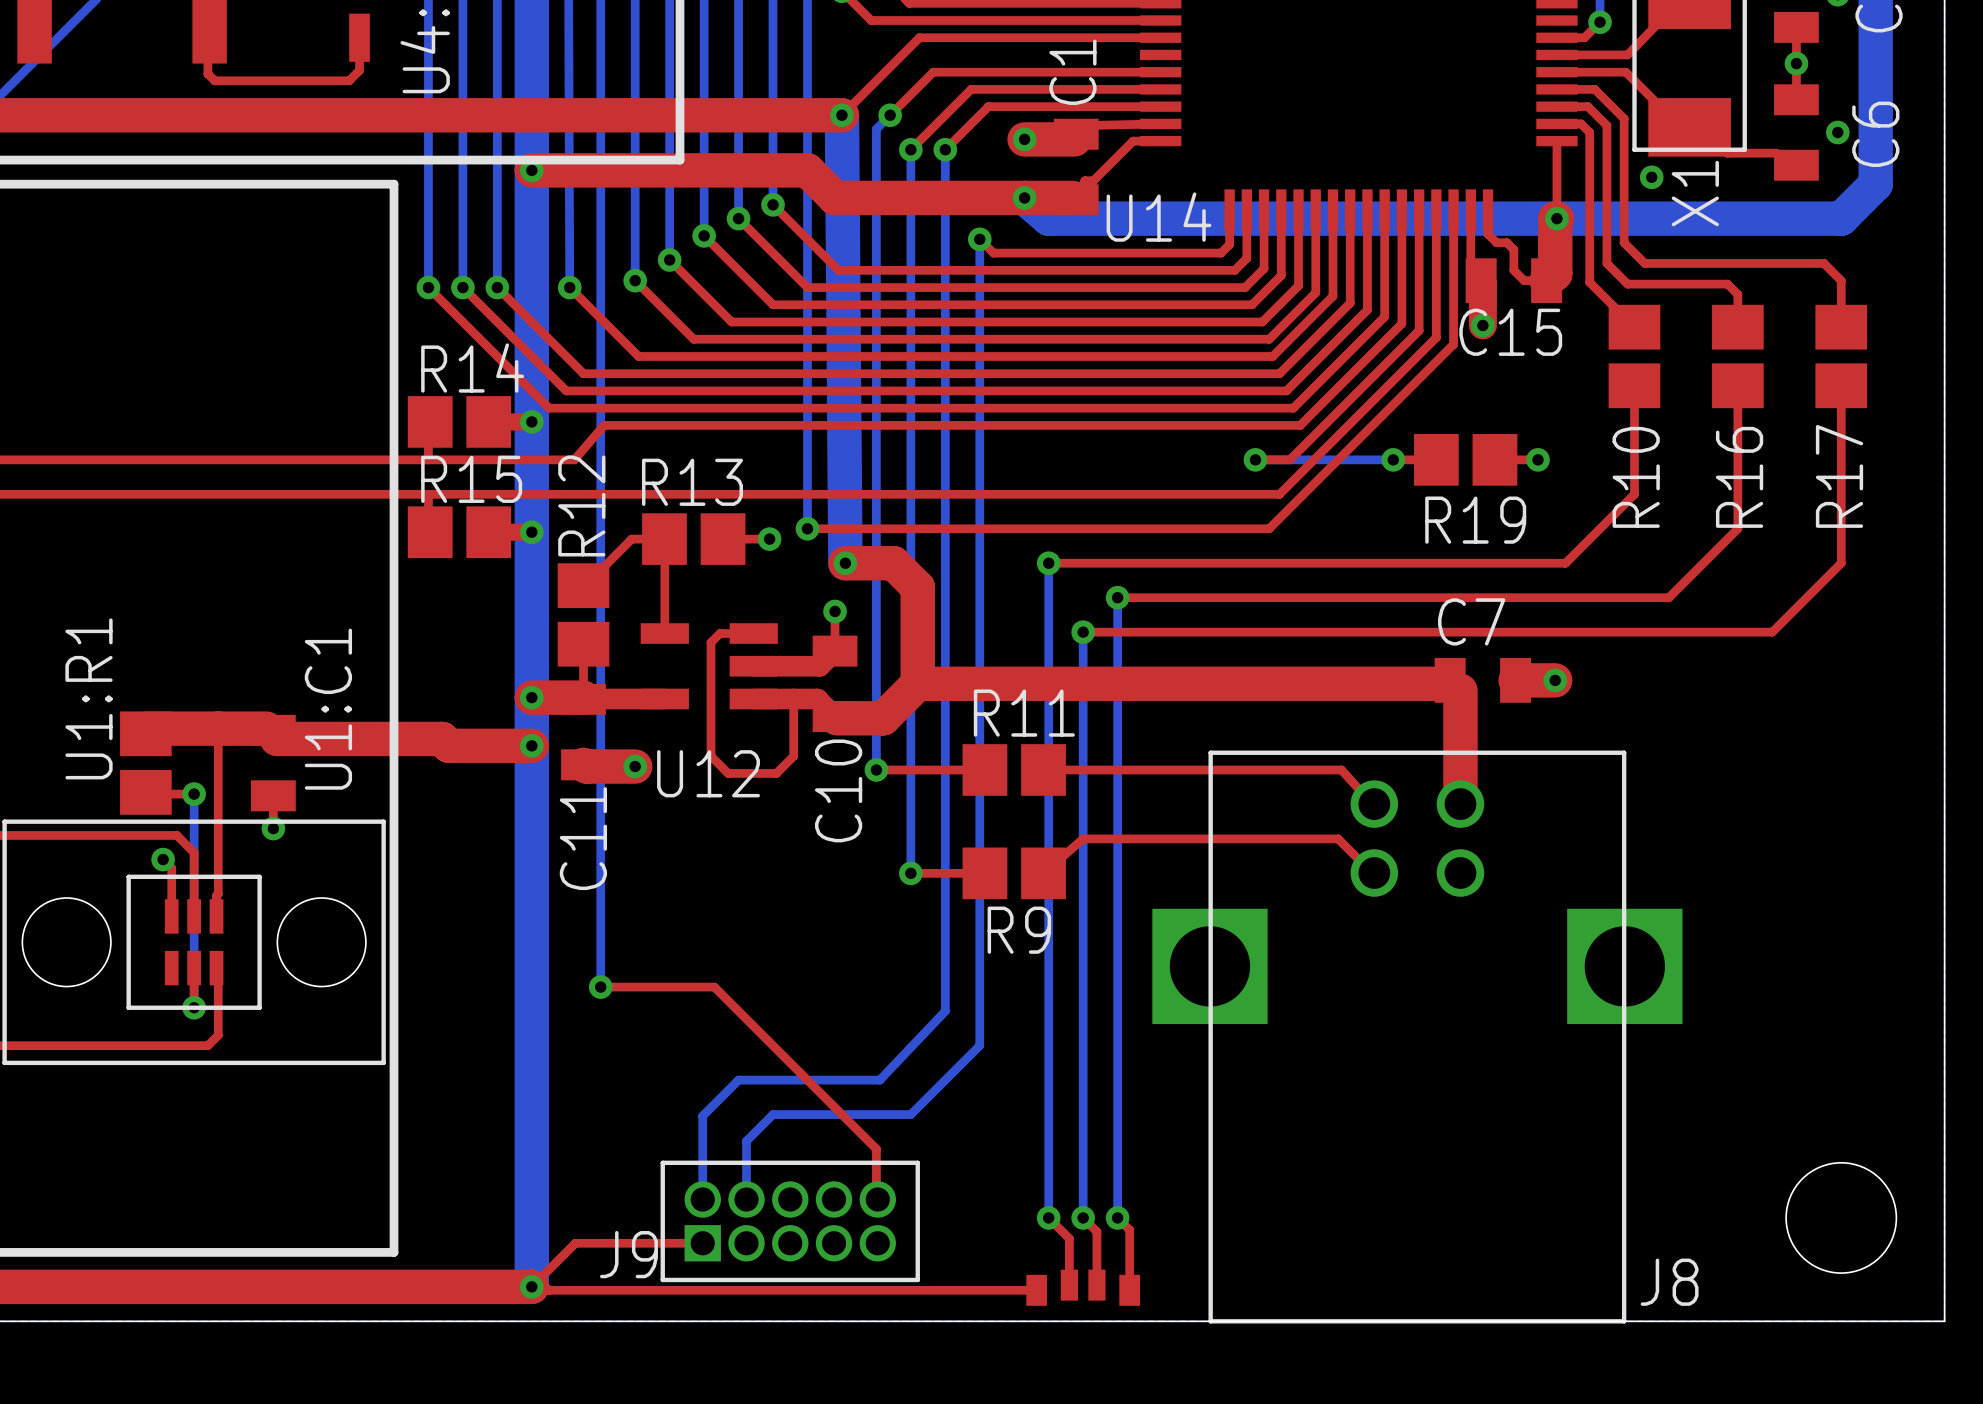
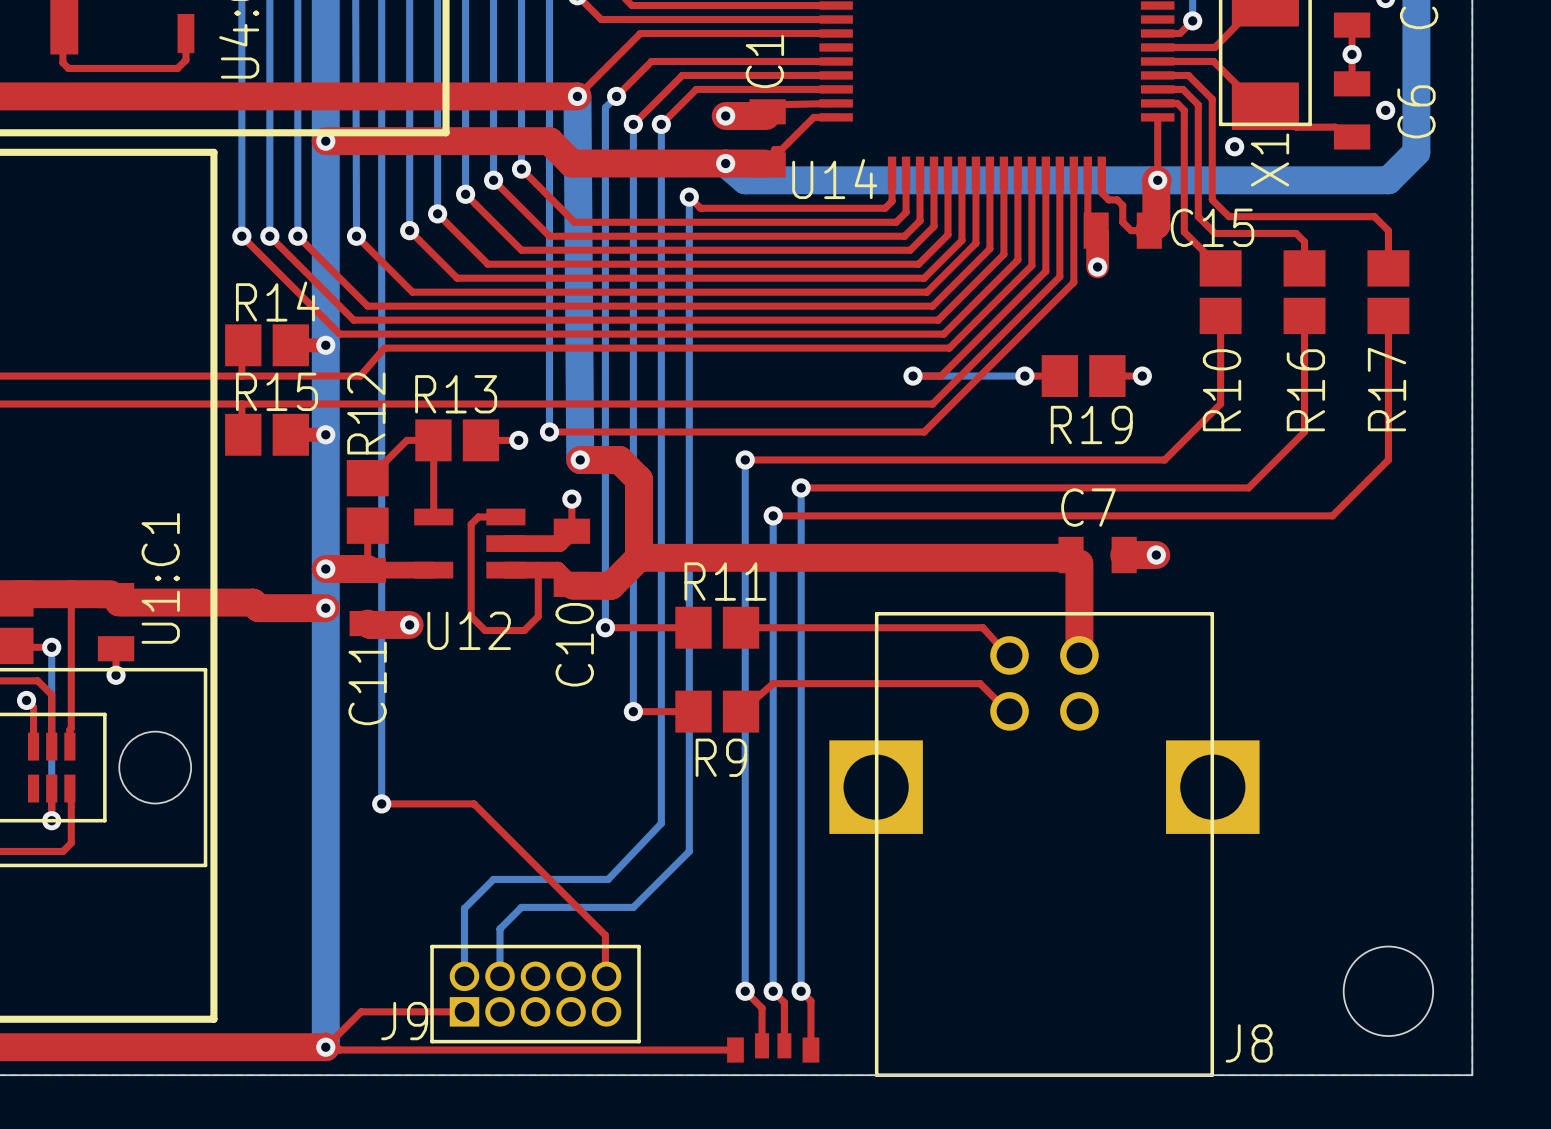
C15 name position: C15 (1510, 332) -> C15 (1212, 227)

